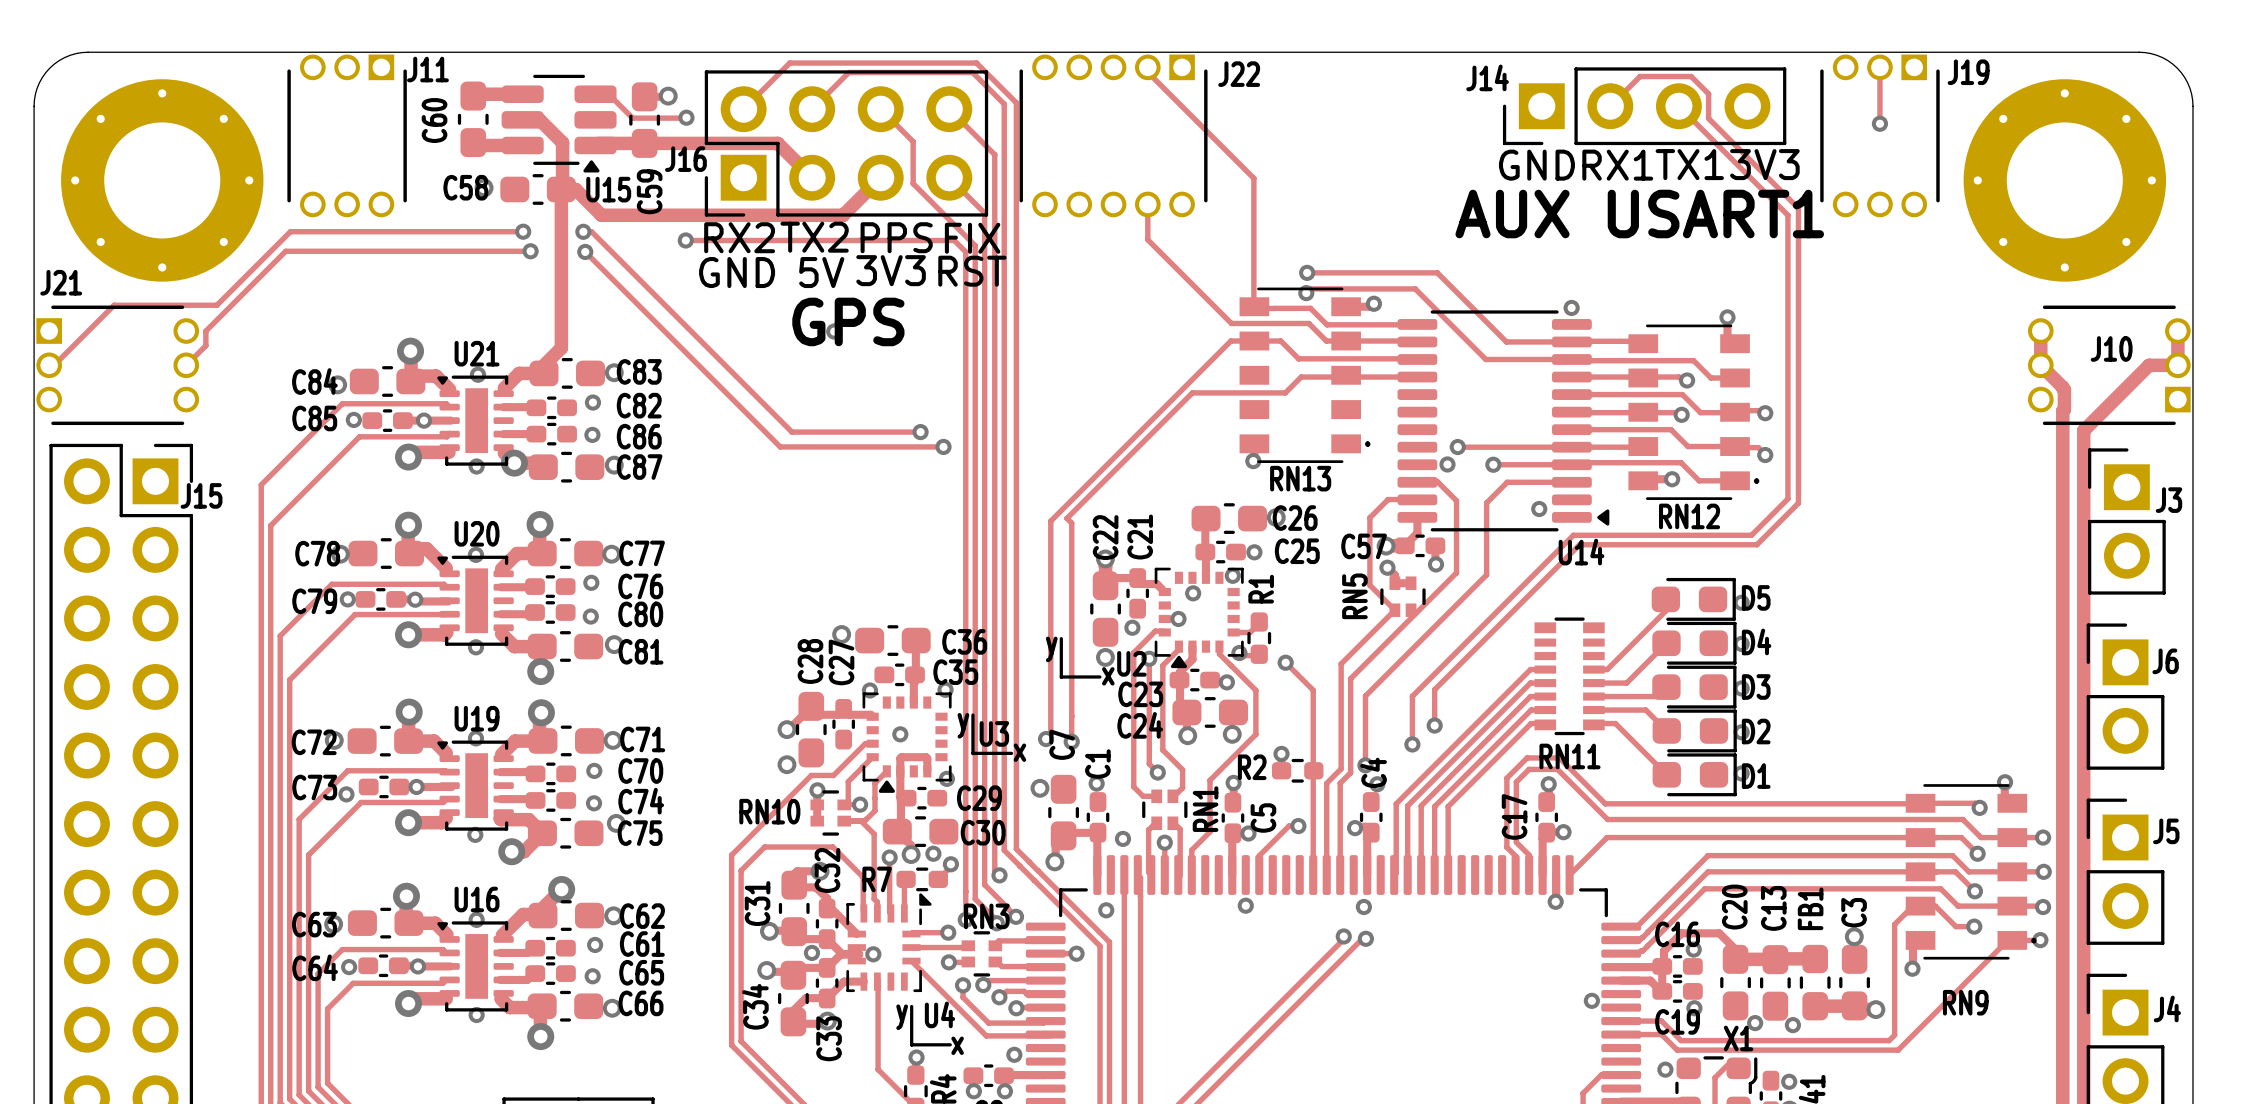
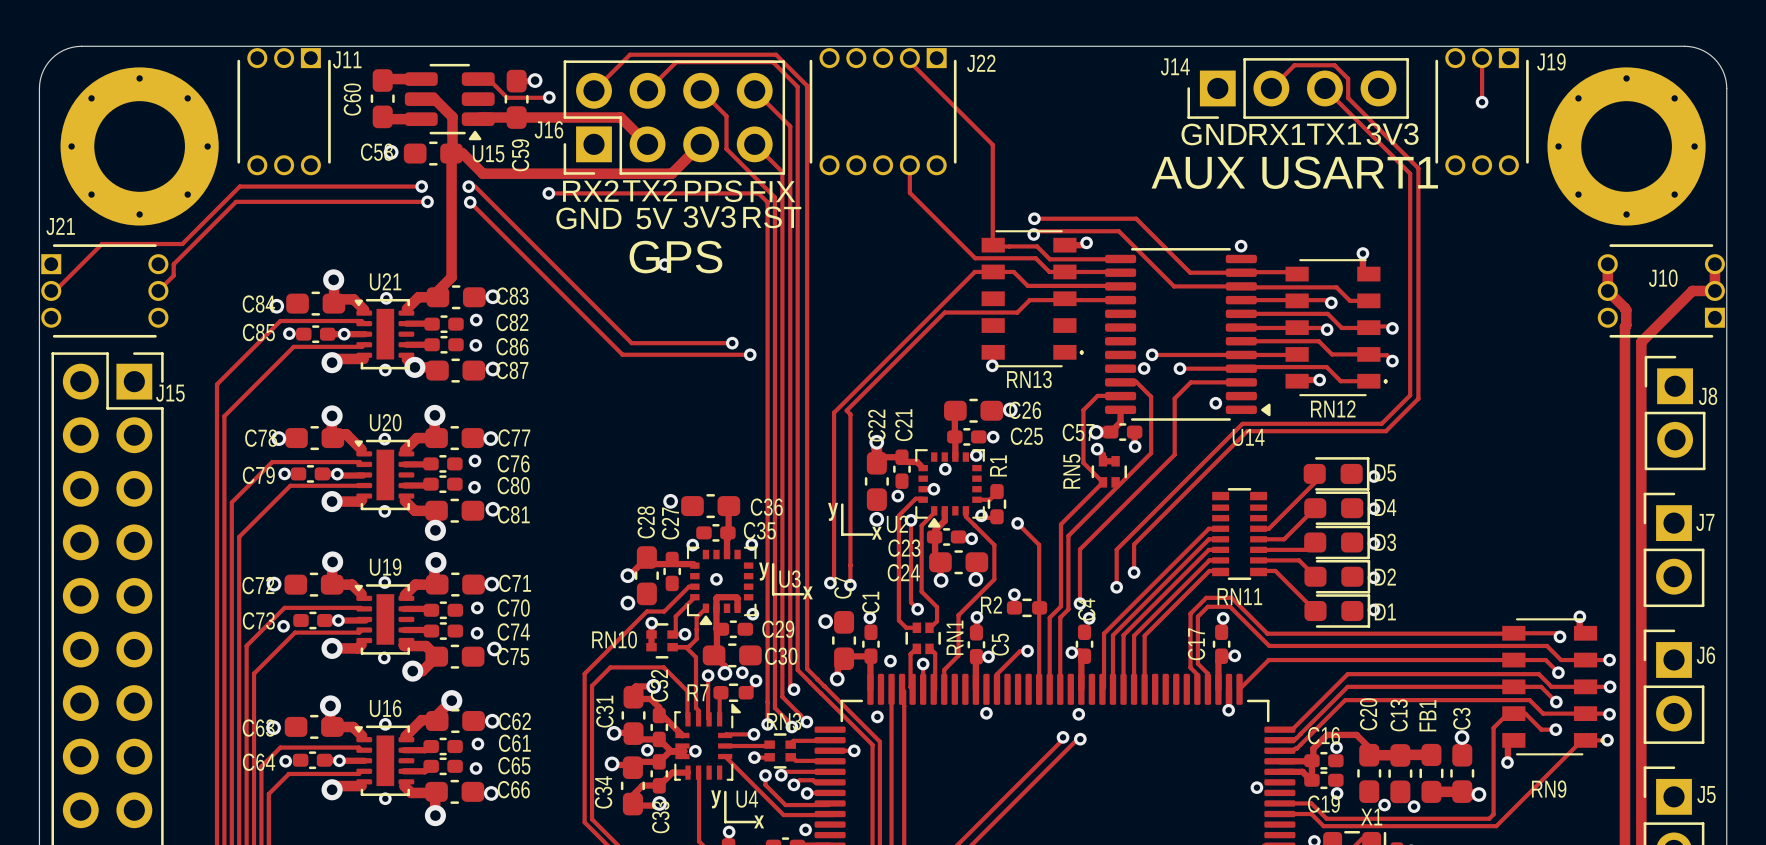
J3 name: J3 (2169, 500) -> J8 (1708, 396)
J6 name: J6 (2165, 661) -> J7 (1705, 522)
J5 name: J5 (2166, 831) -> J6 (1705, 655)
J4 name: J4 (2167, 1008) -> J5 (1706, 794)

